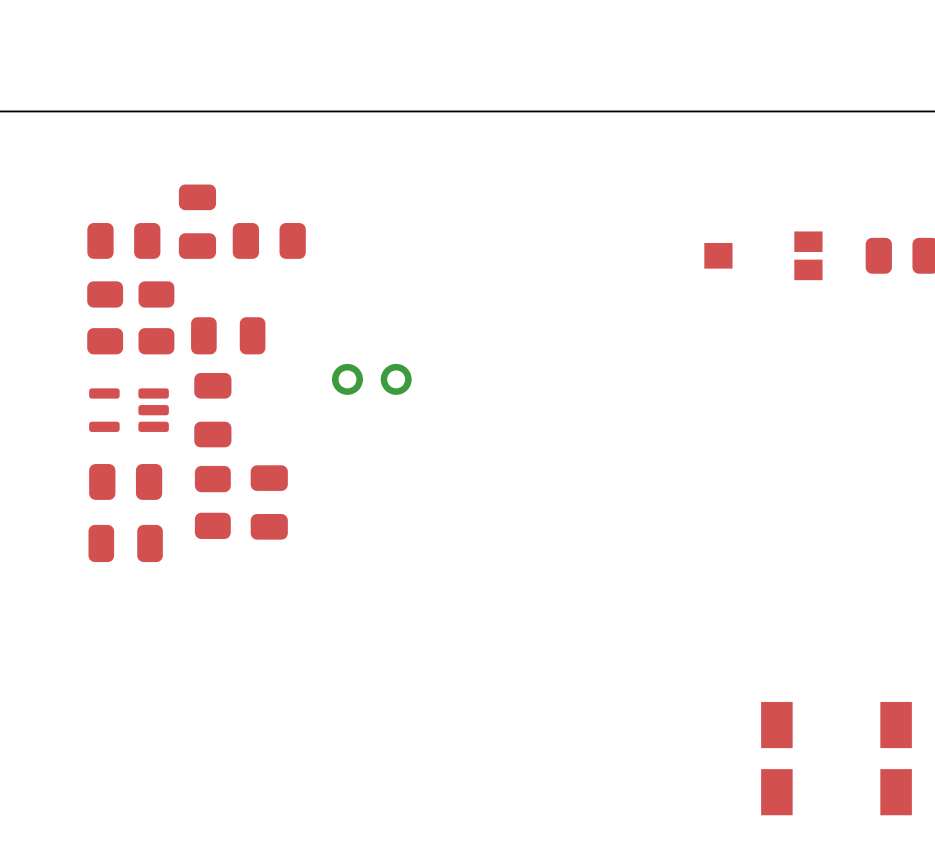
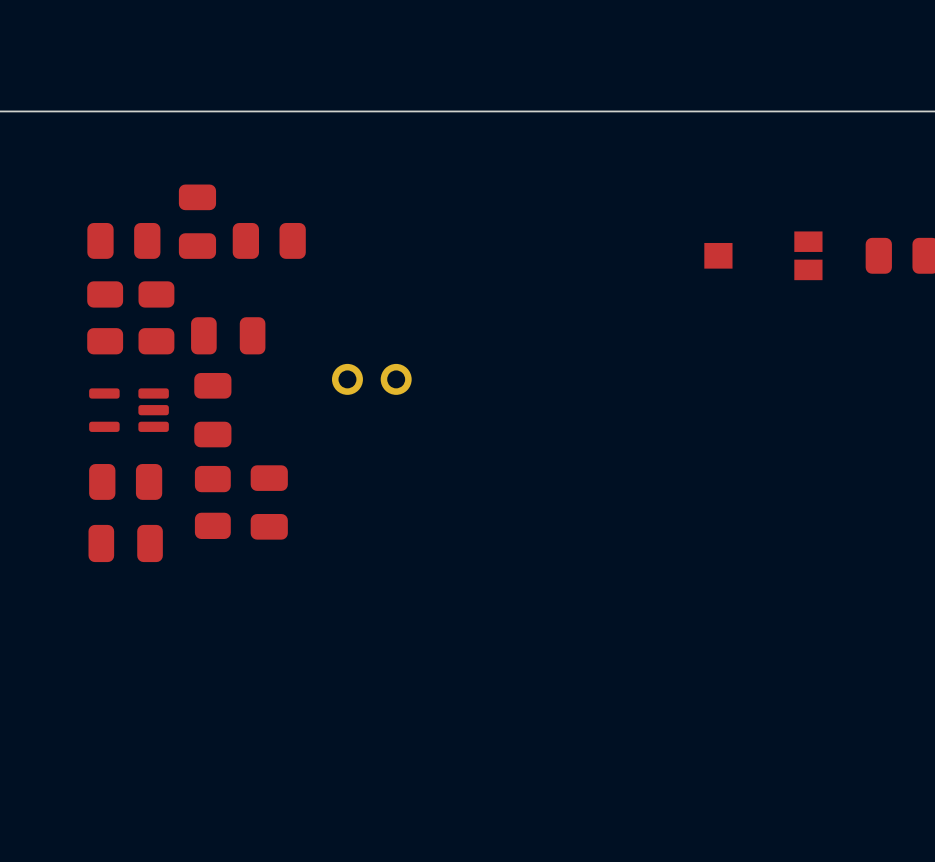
part: (776, 758) -> none
part: (896, 758) -> none

